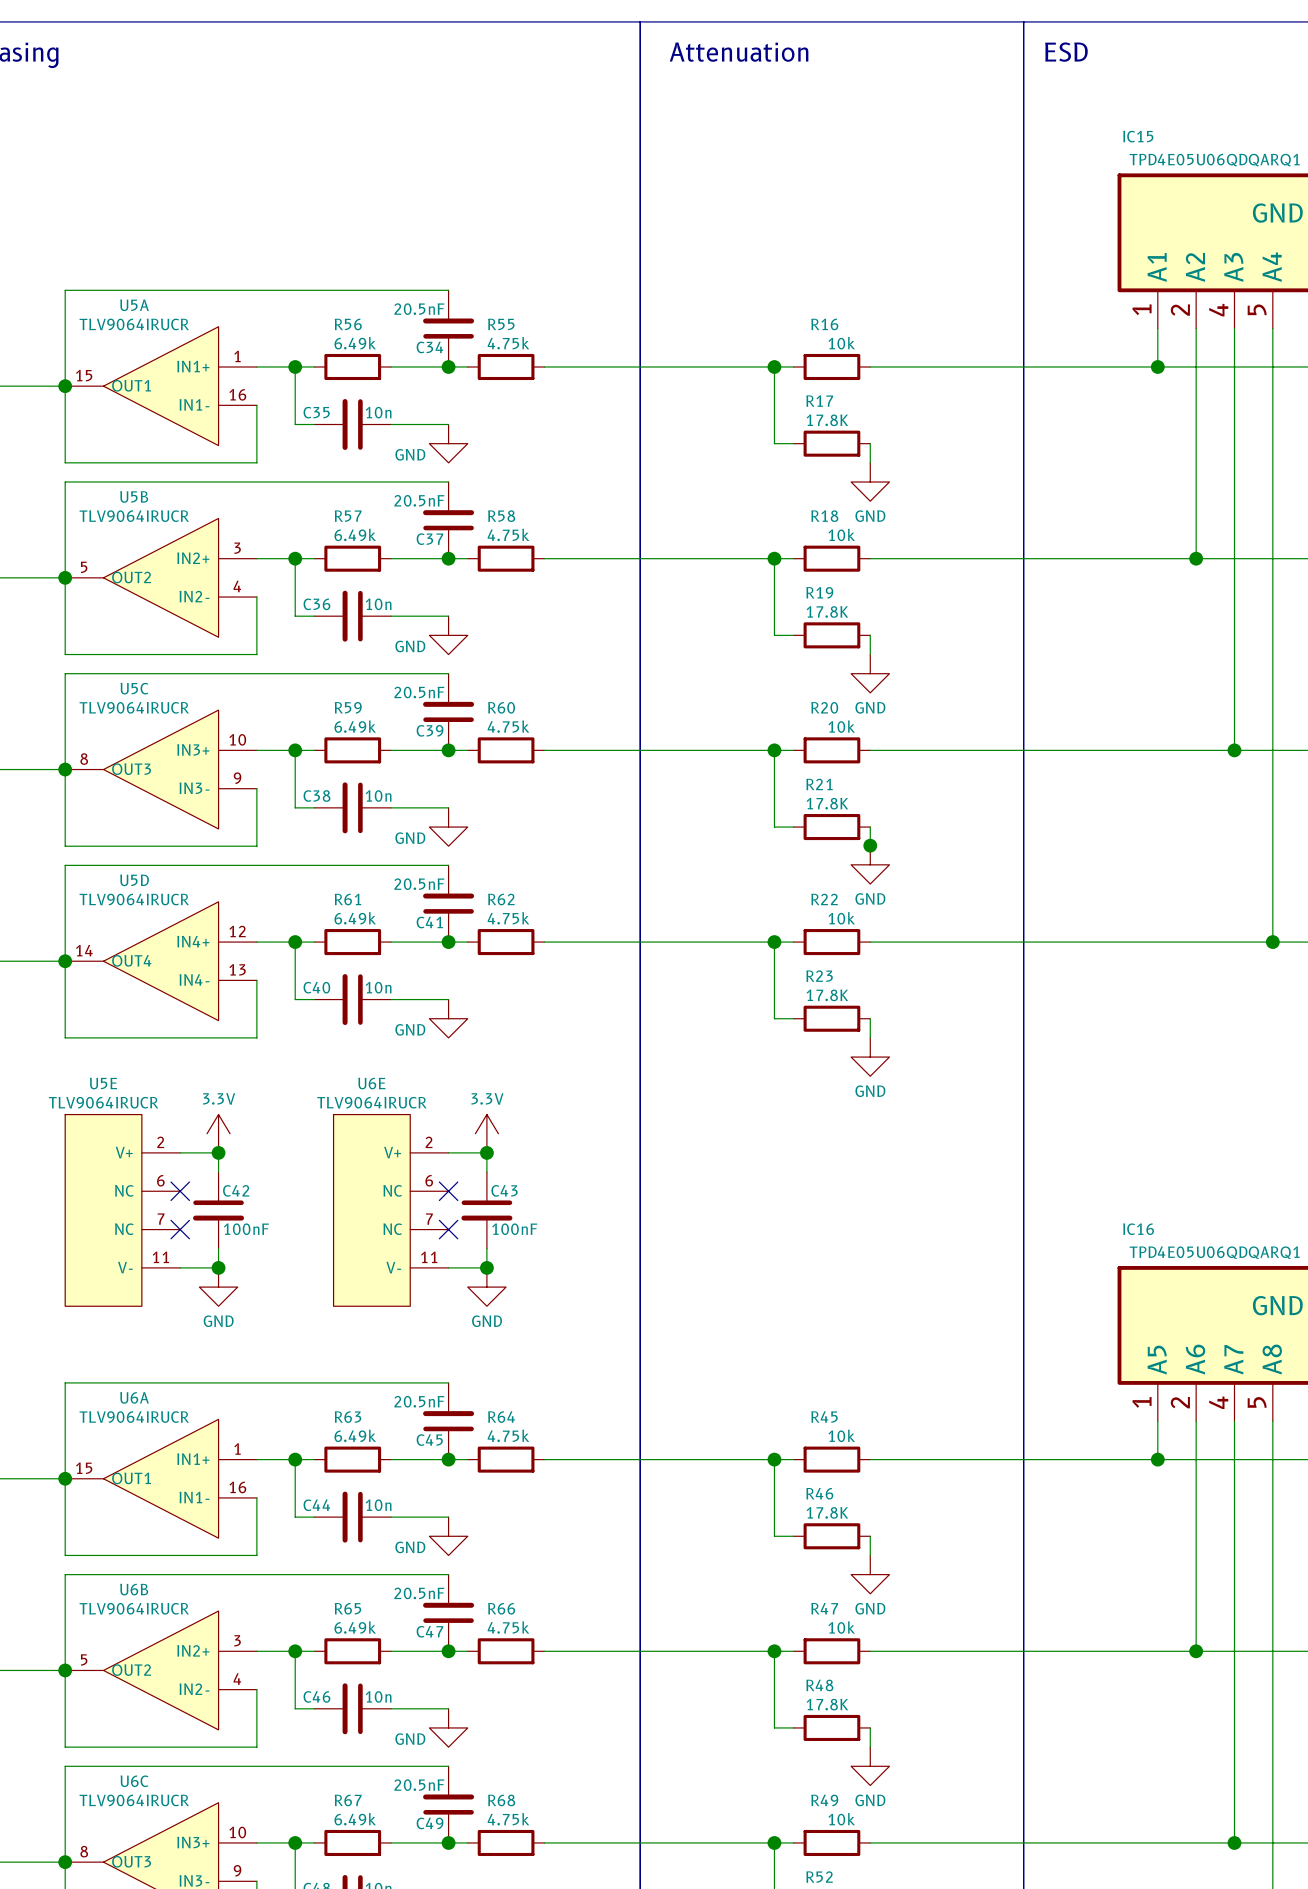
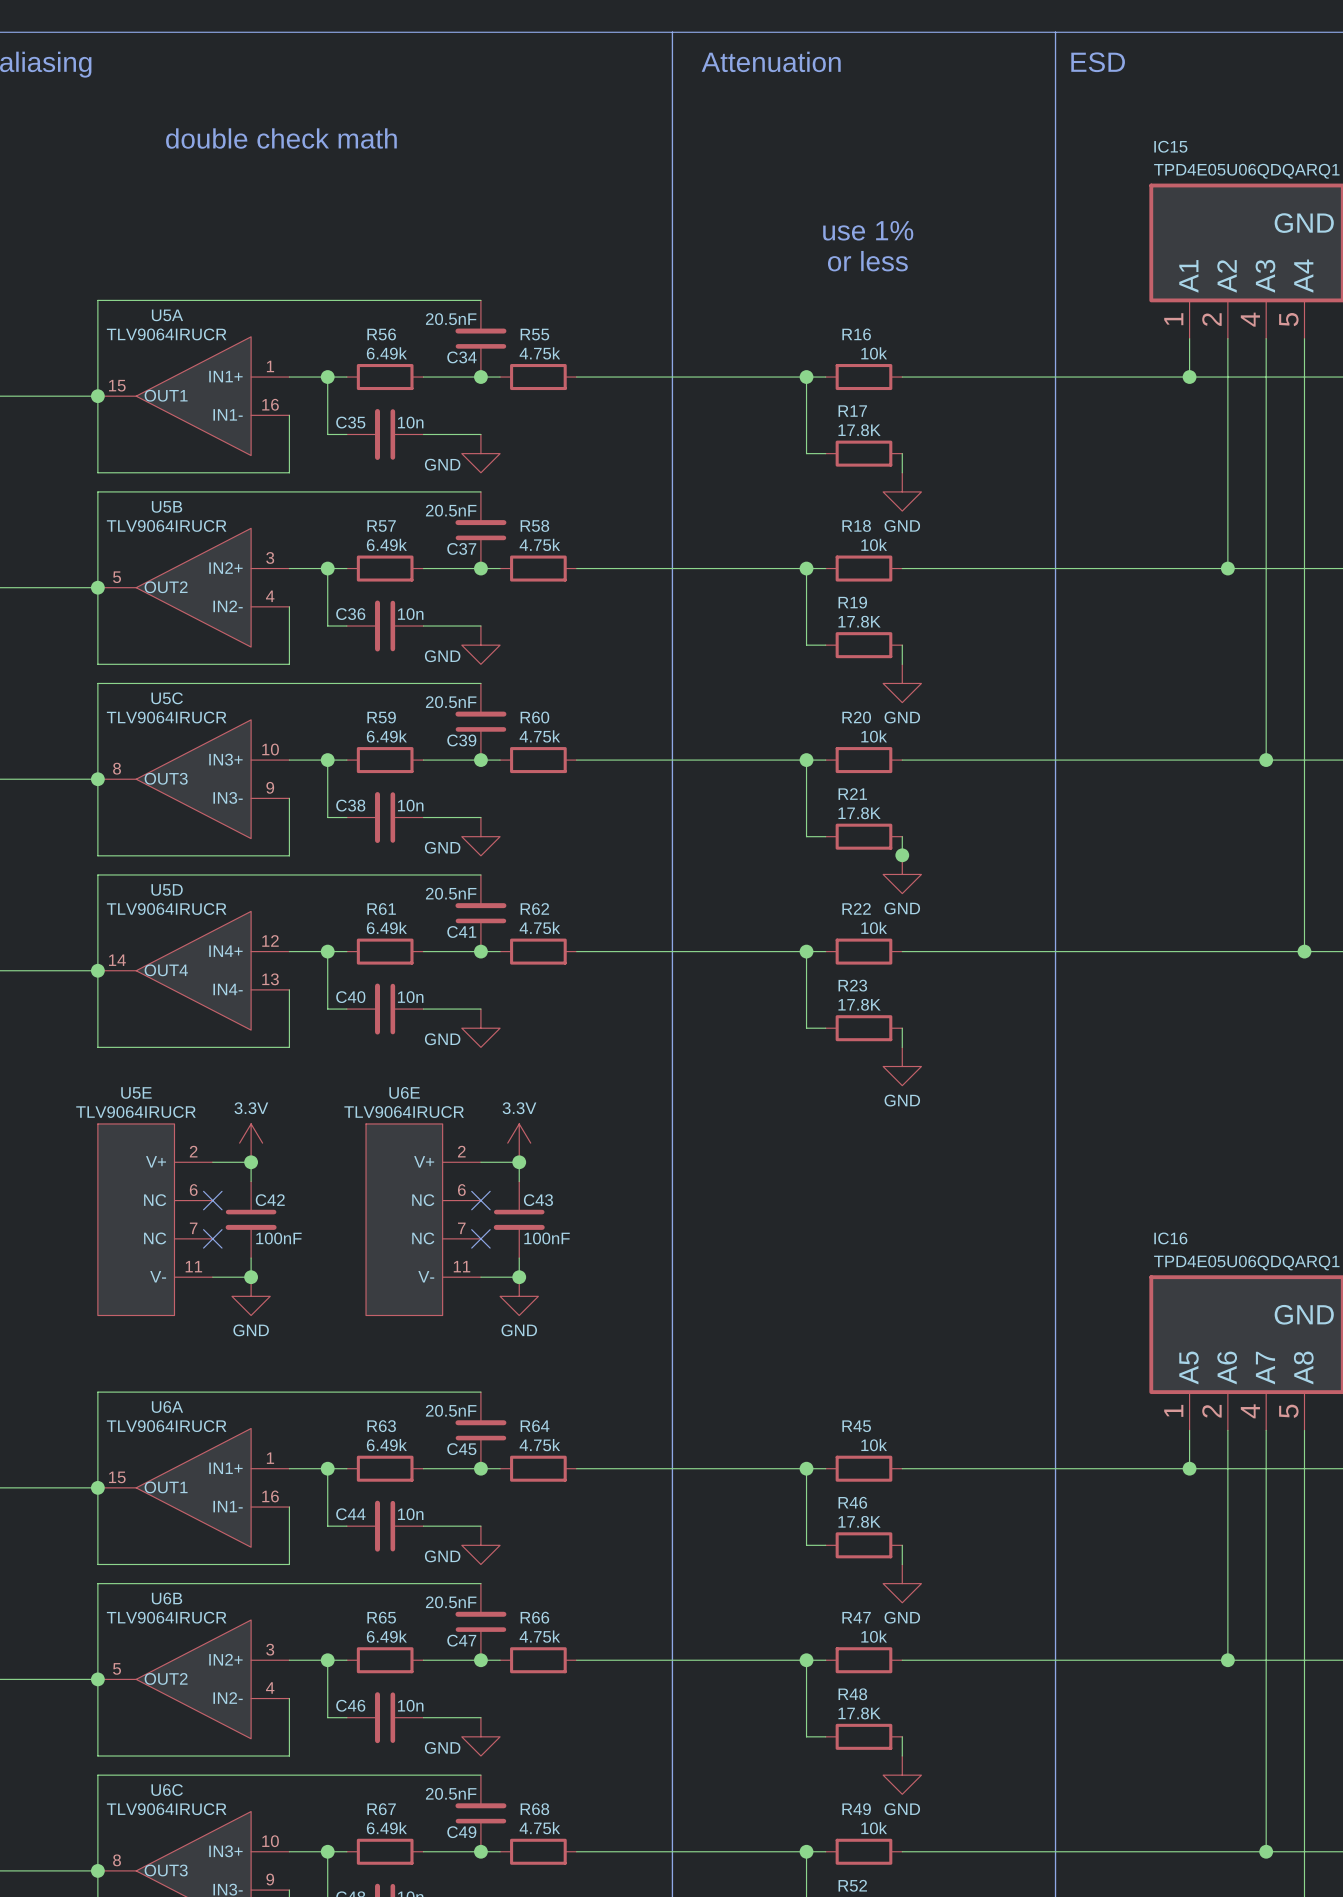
text: none -> double check math (281, 138)
text: none -> use 1% (868, 230)
text: none -> or less (867, 261)

